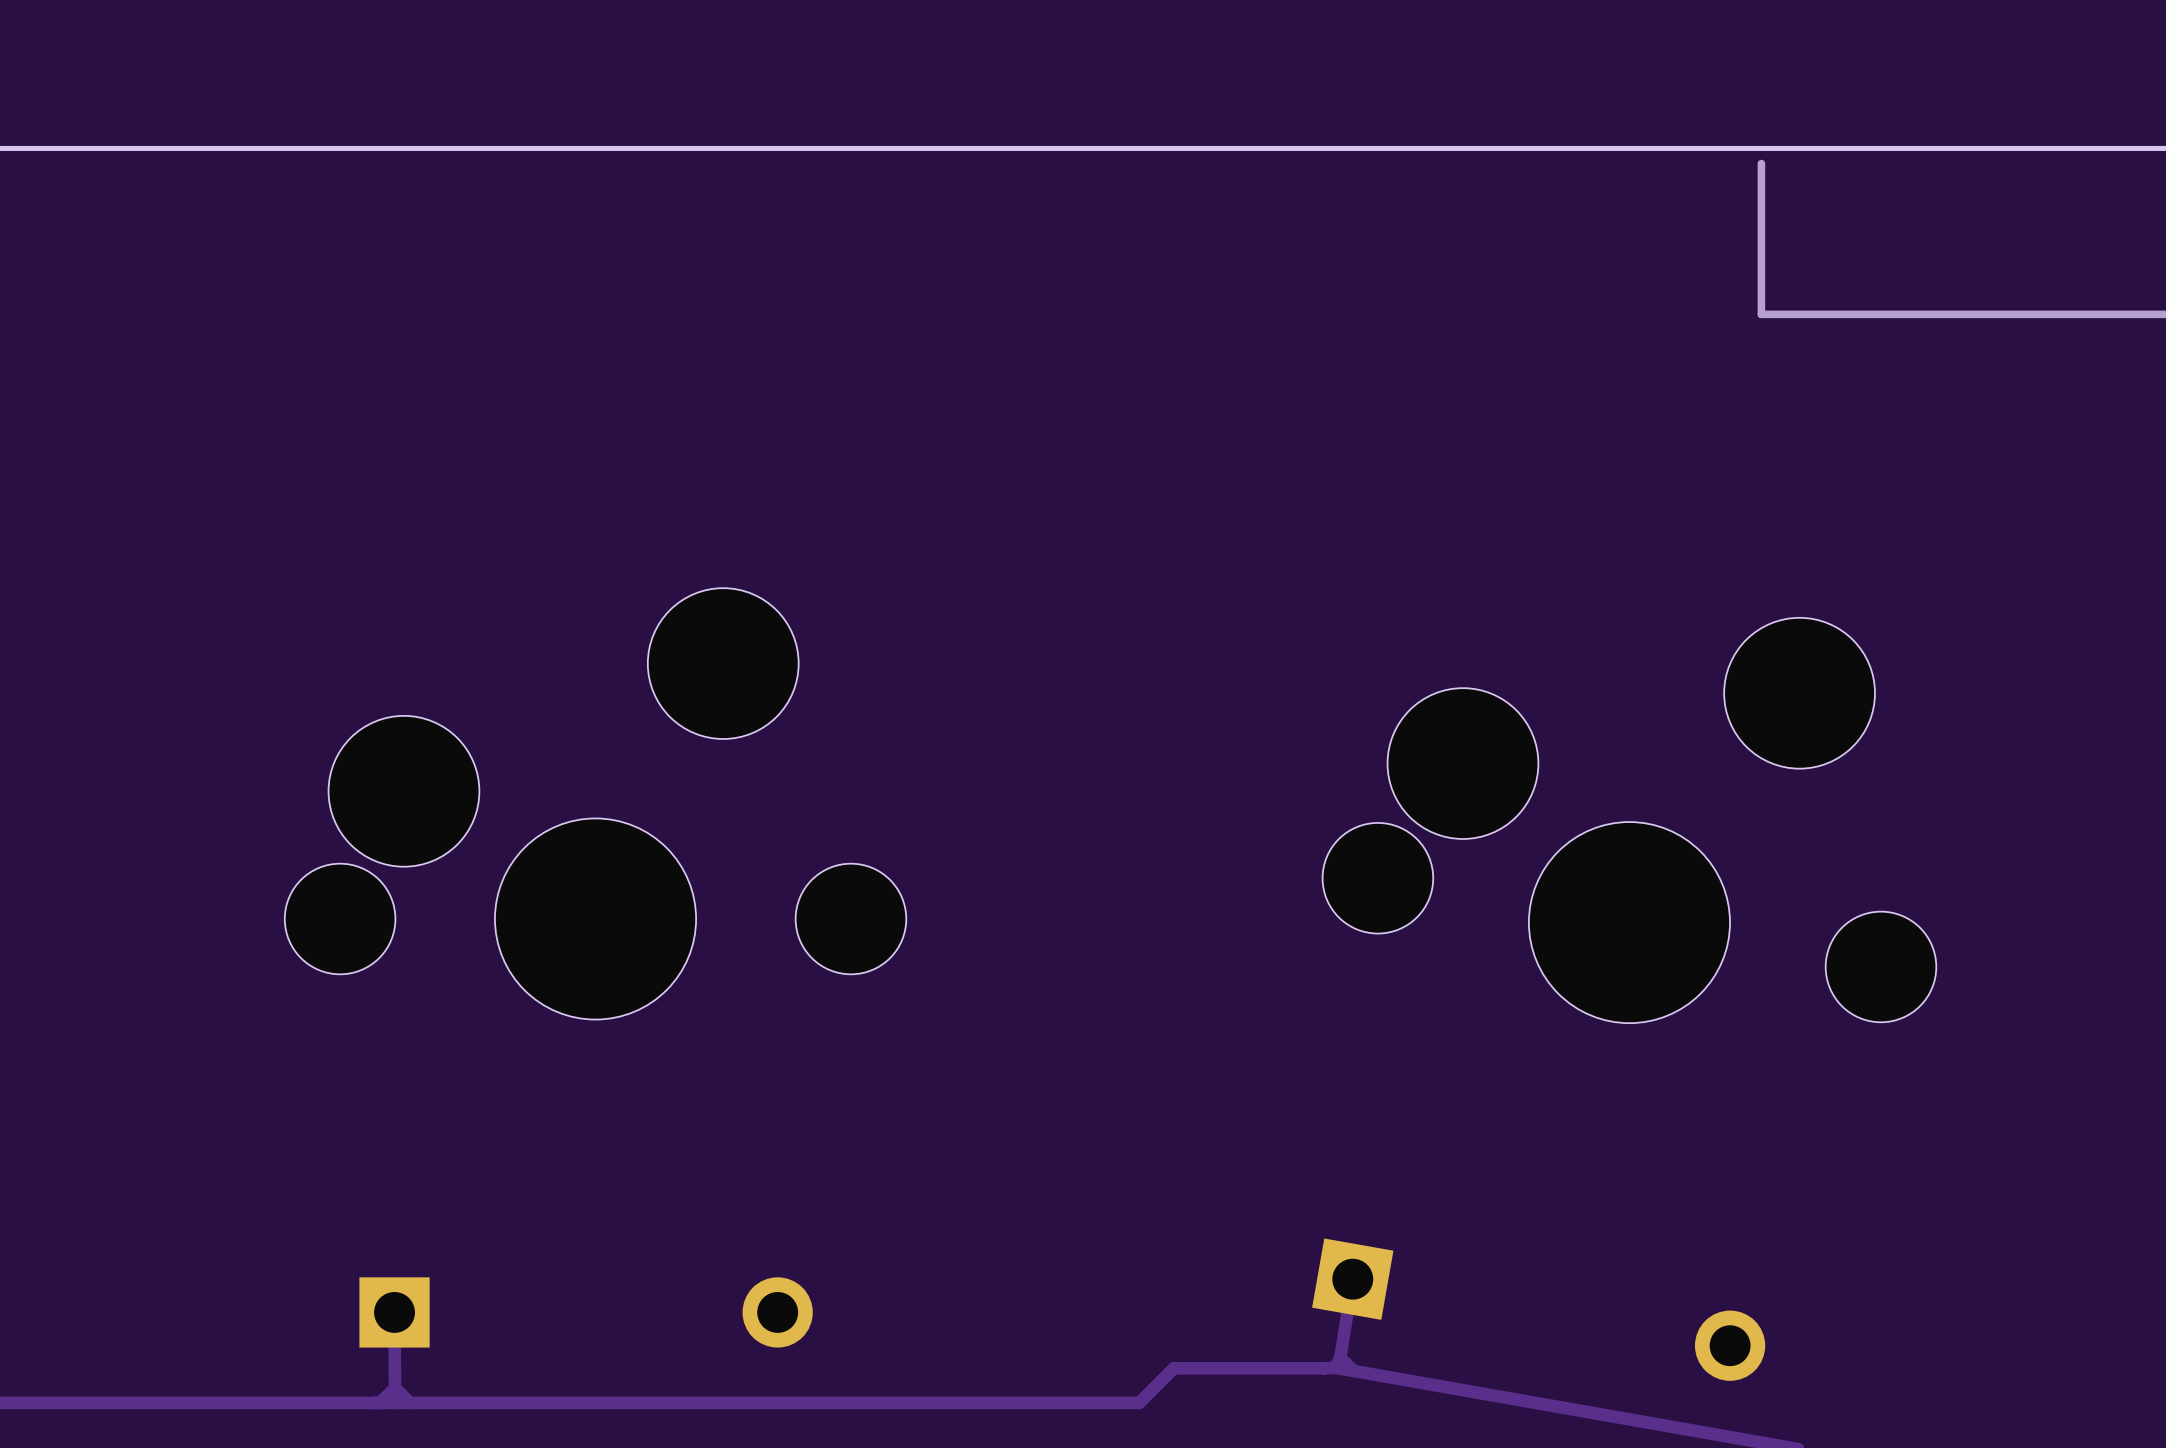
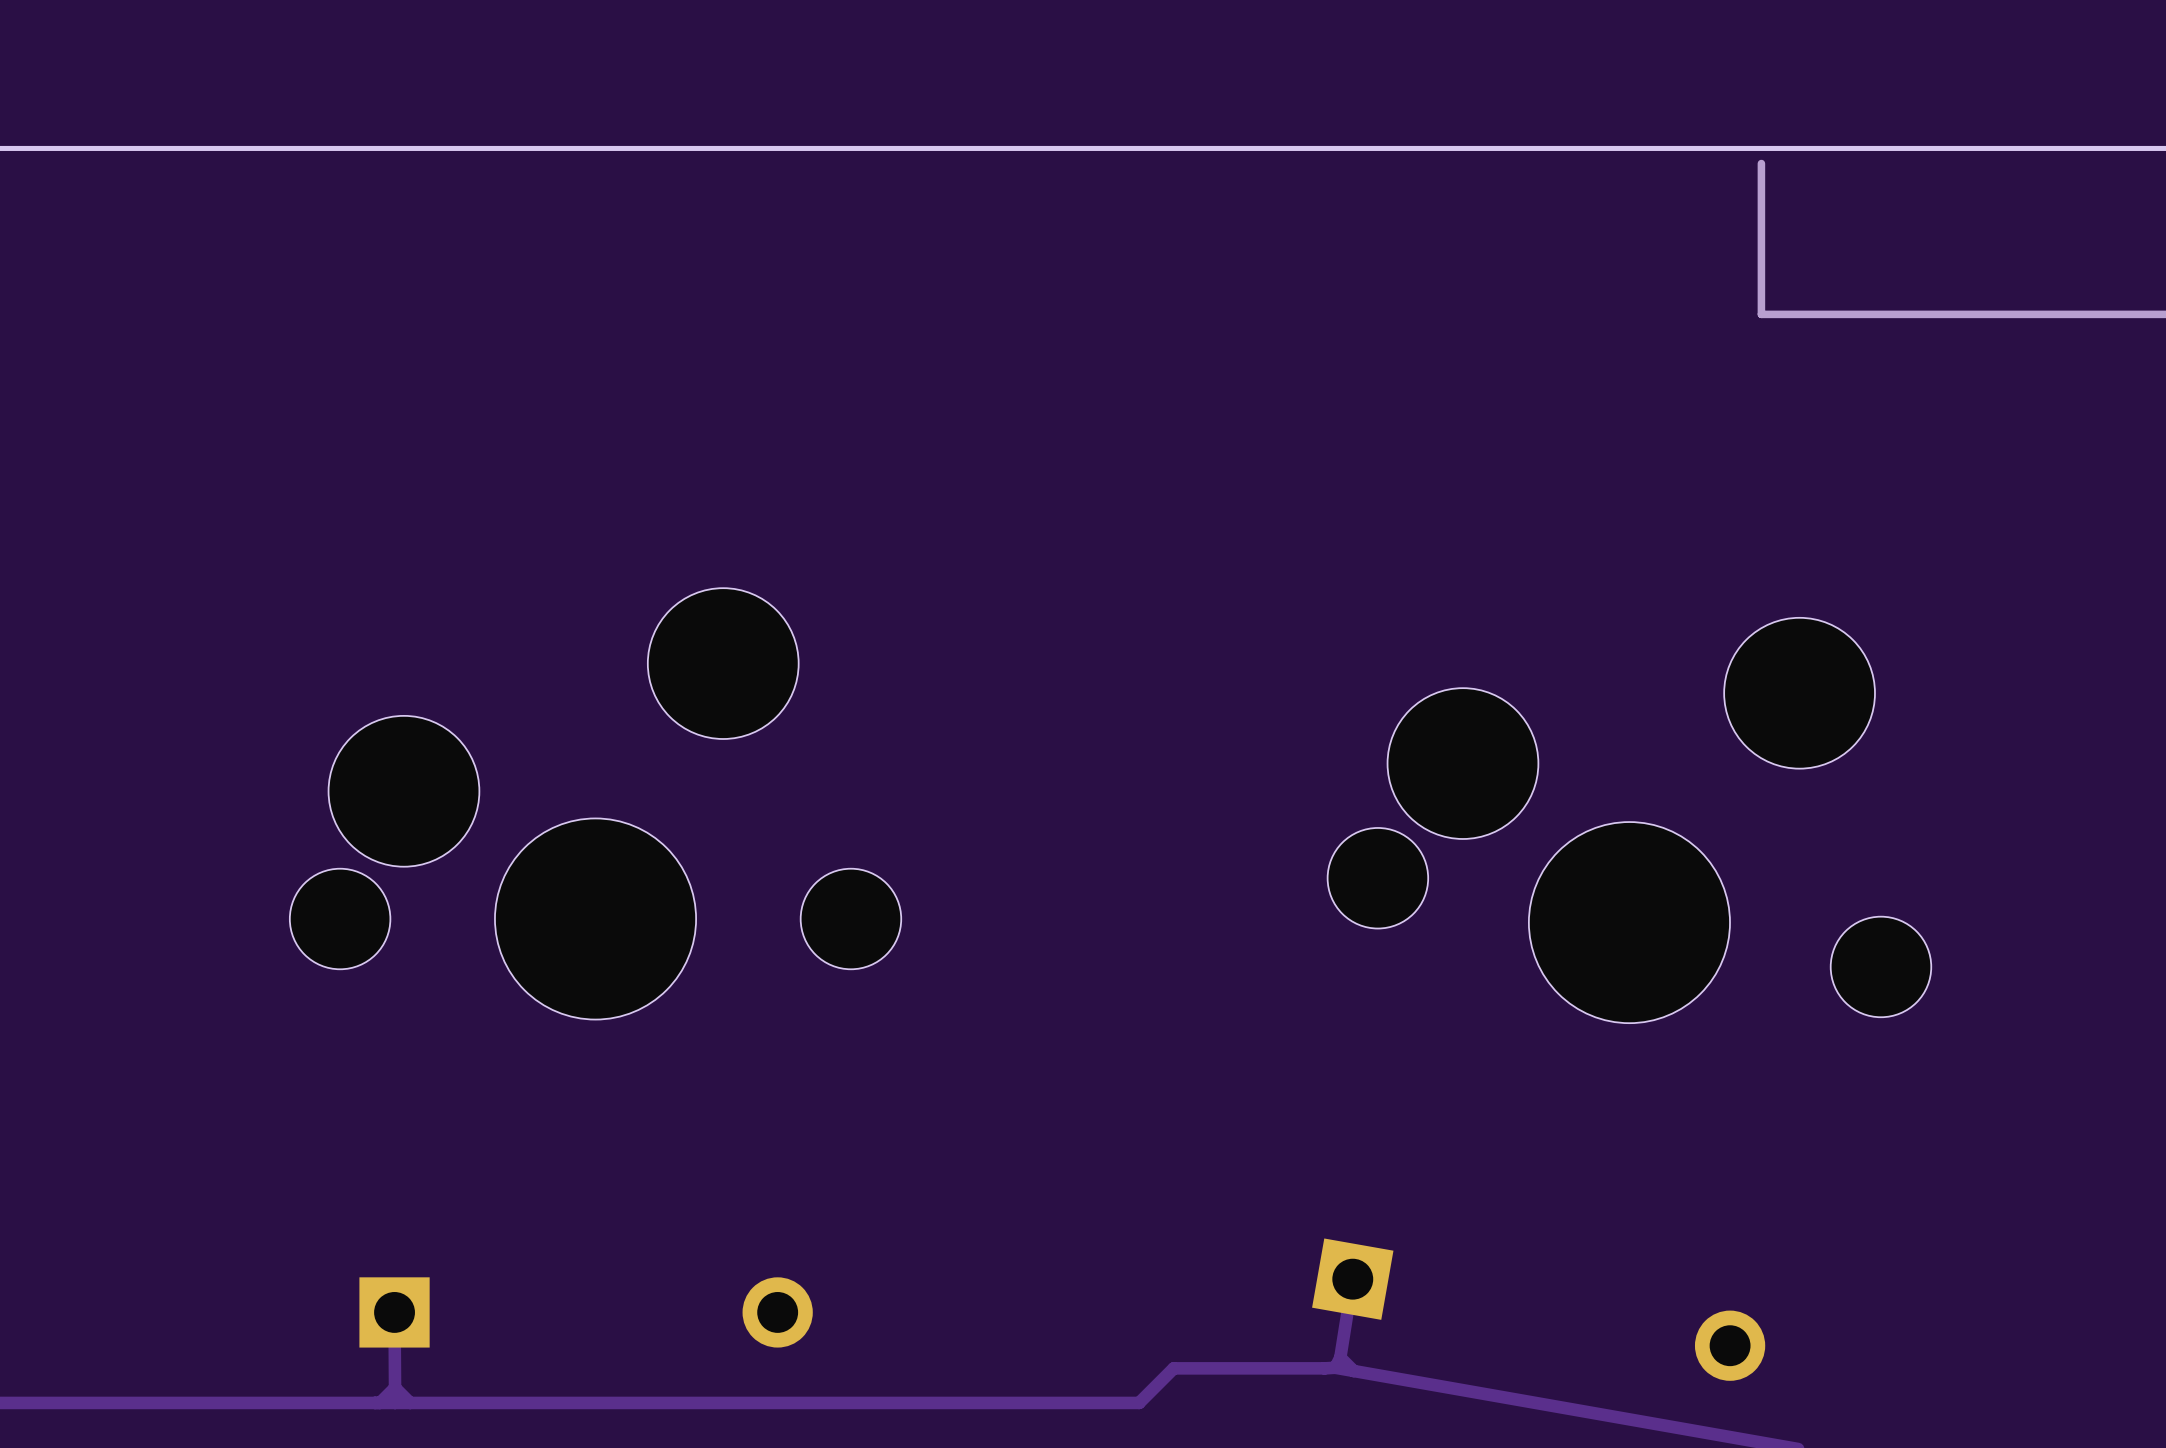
part footprint: [284, 588, 907, 1020] -> [289, 588, 902, 1020]
part footprint: [1322, 617, 1937, 1024] -> [1327, 617, 1932, 1024]

